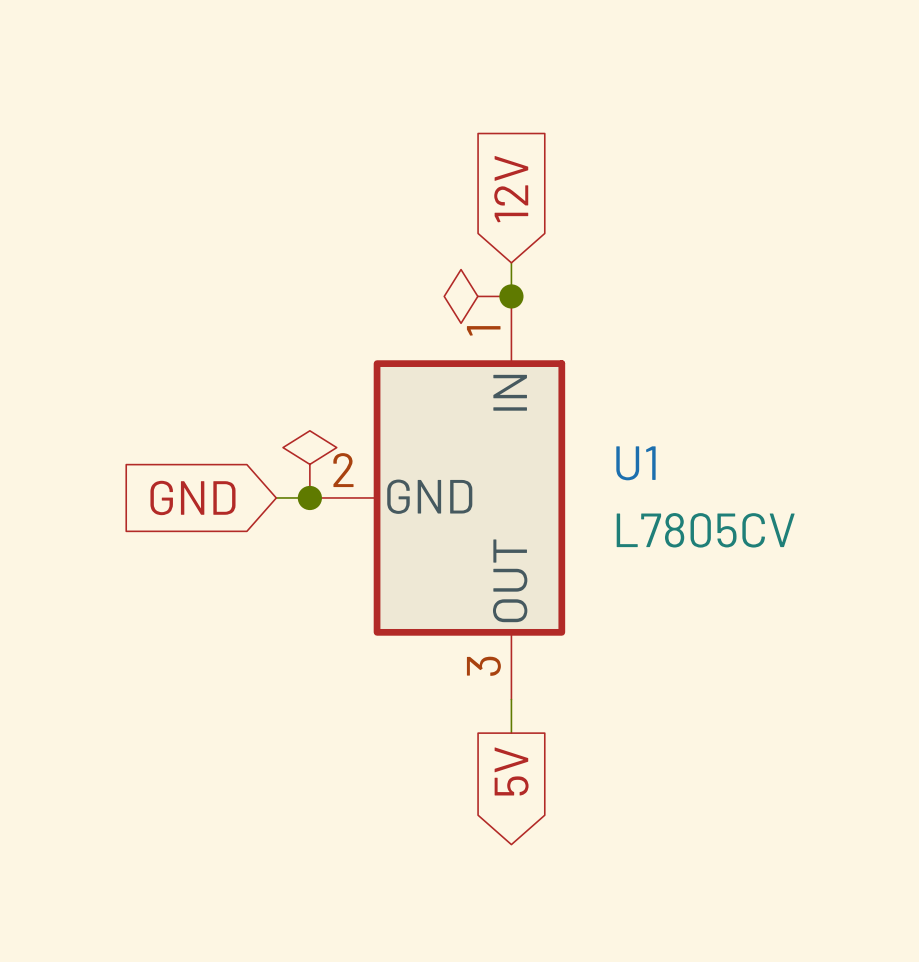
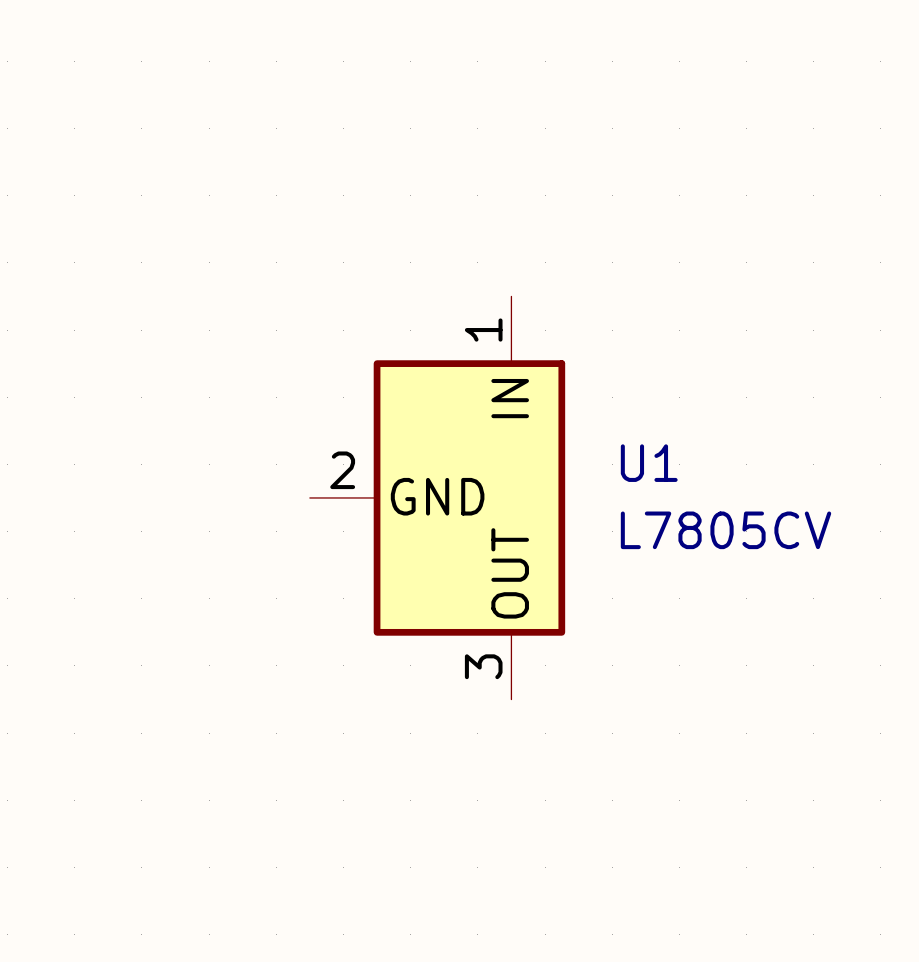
global label: 12V (511, 189) -> none
wire: (511, 262) (511, 296) -> none
power symbol: (477, 296) -> none
junction: (511, 296) -> none
power symbol: (309, 464) -> none
global label: GND (192, 497) -> none
wire: (276, 497) (309, 497) -> none
junction: (309, 497) -> none
wire: (511, 699) (511, 733) -> none
global label: 5V (511, 771) -> none

